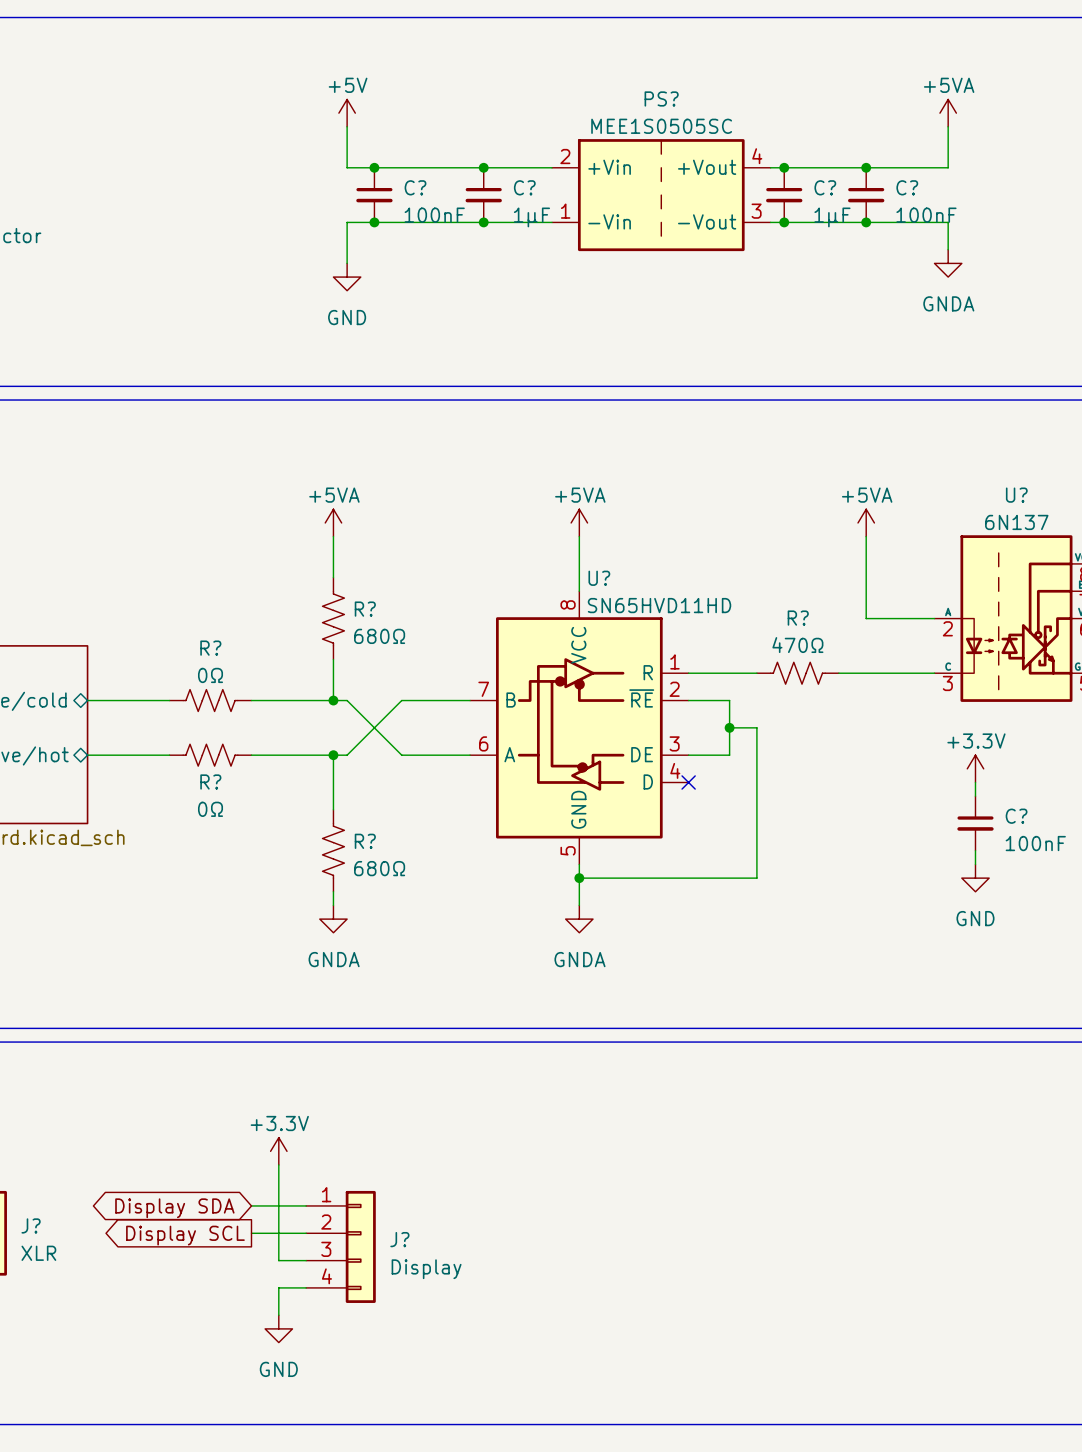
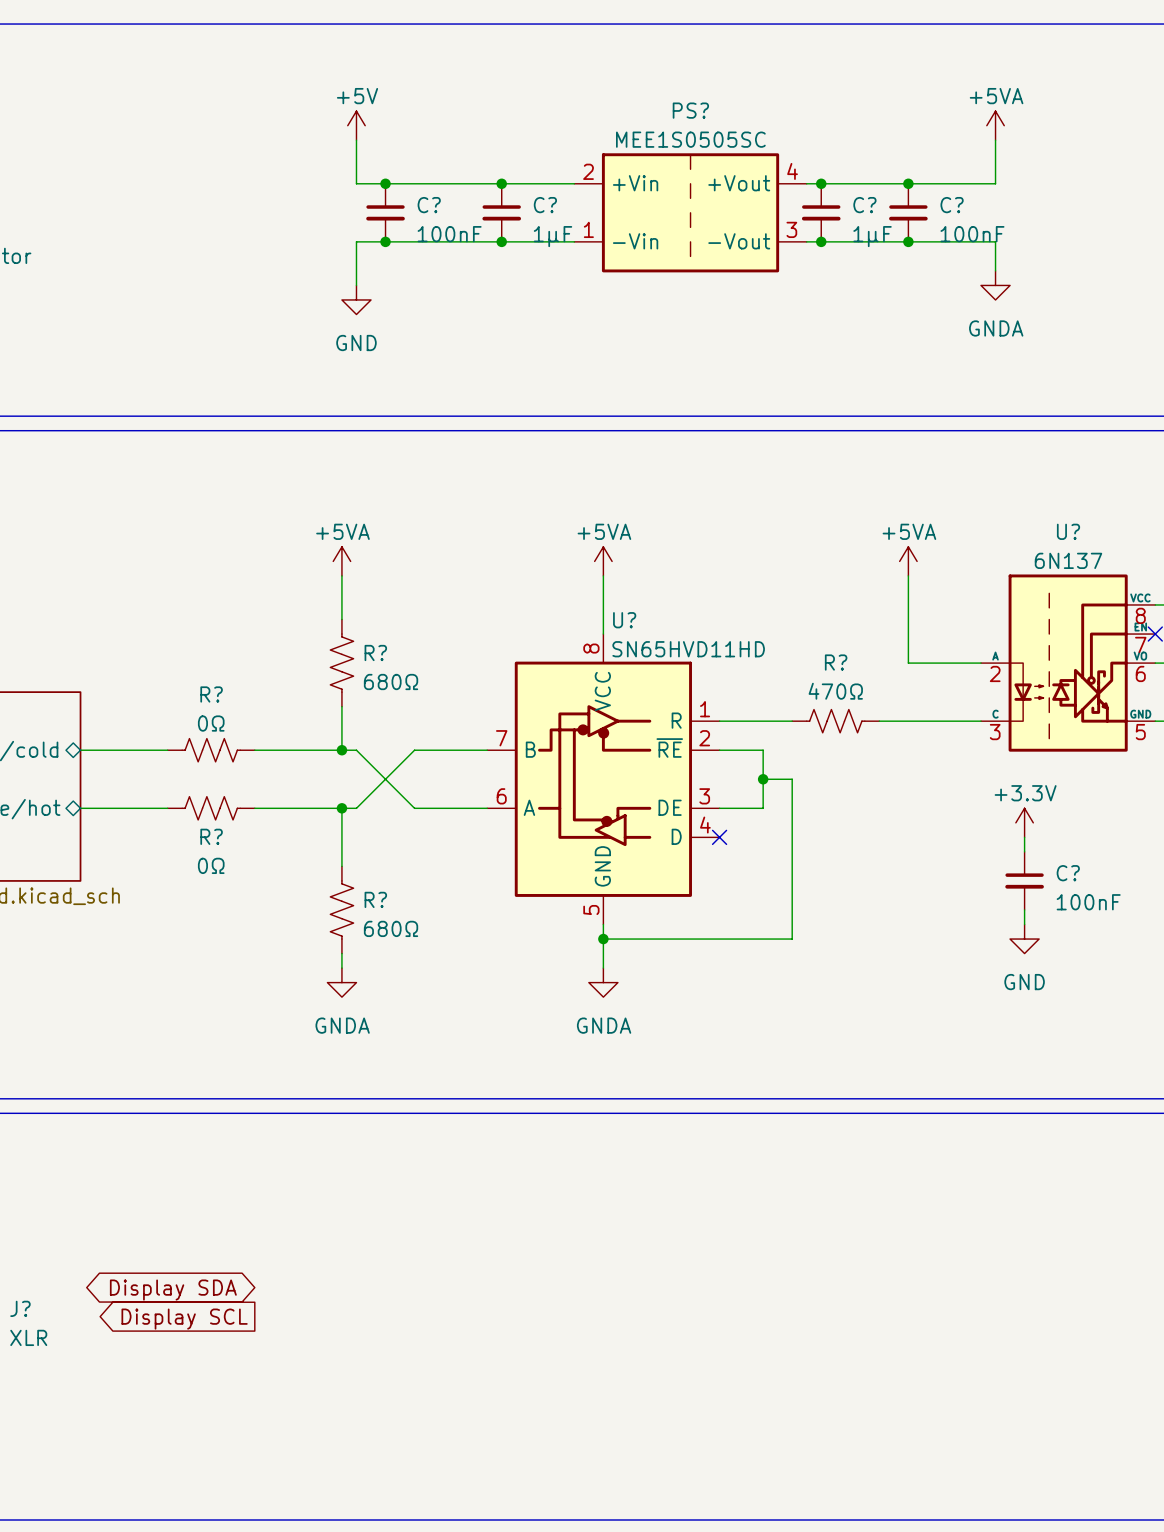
power symbol: +3.3V (278, 1151) -> none
wire: (278, 1164) (278, 1260) (306, 1260) -> none
wire: (251, 1205) (306, 1205) -> none
wire: (251, 1233) (306, 1233) -> none
J?: Display (340, 1246) -> none
wire: (306, 1287) (278, 1287) (278, 1315) -> none
power symbol: GND (278, 1328) -> none

